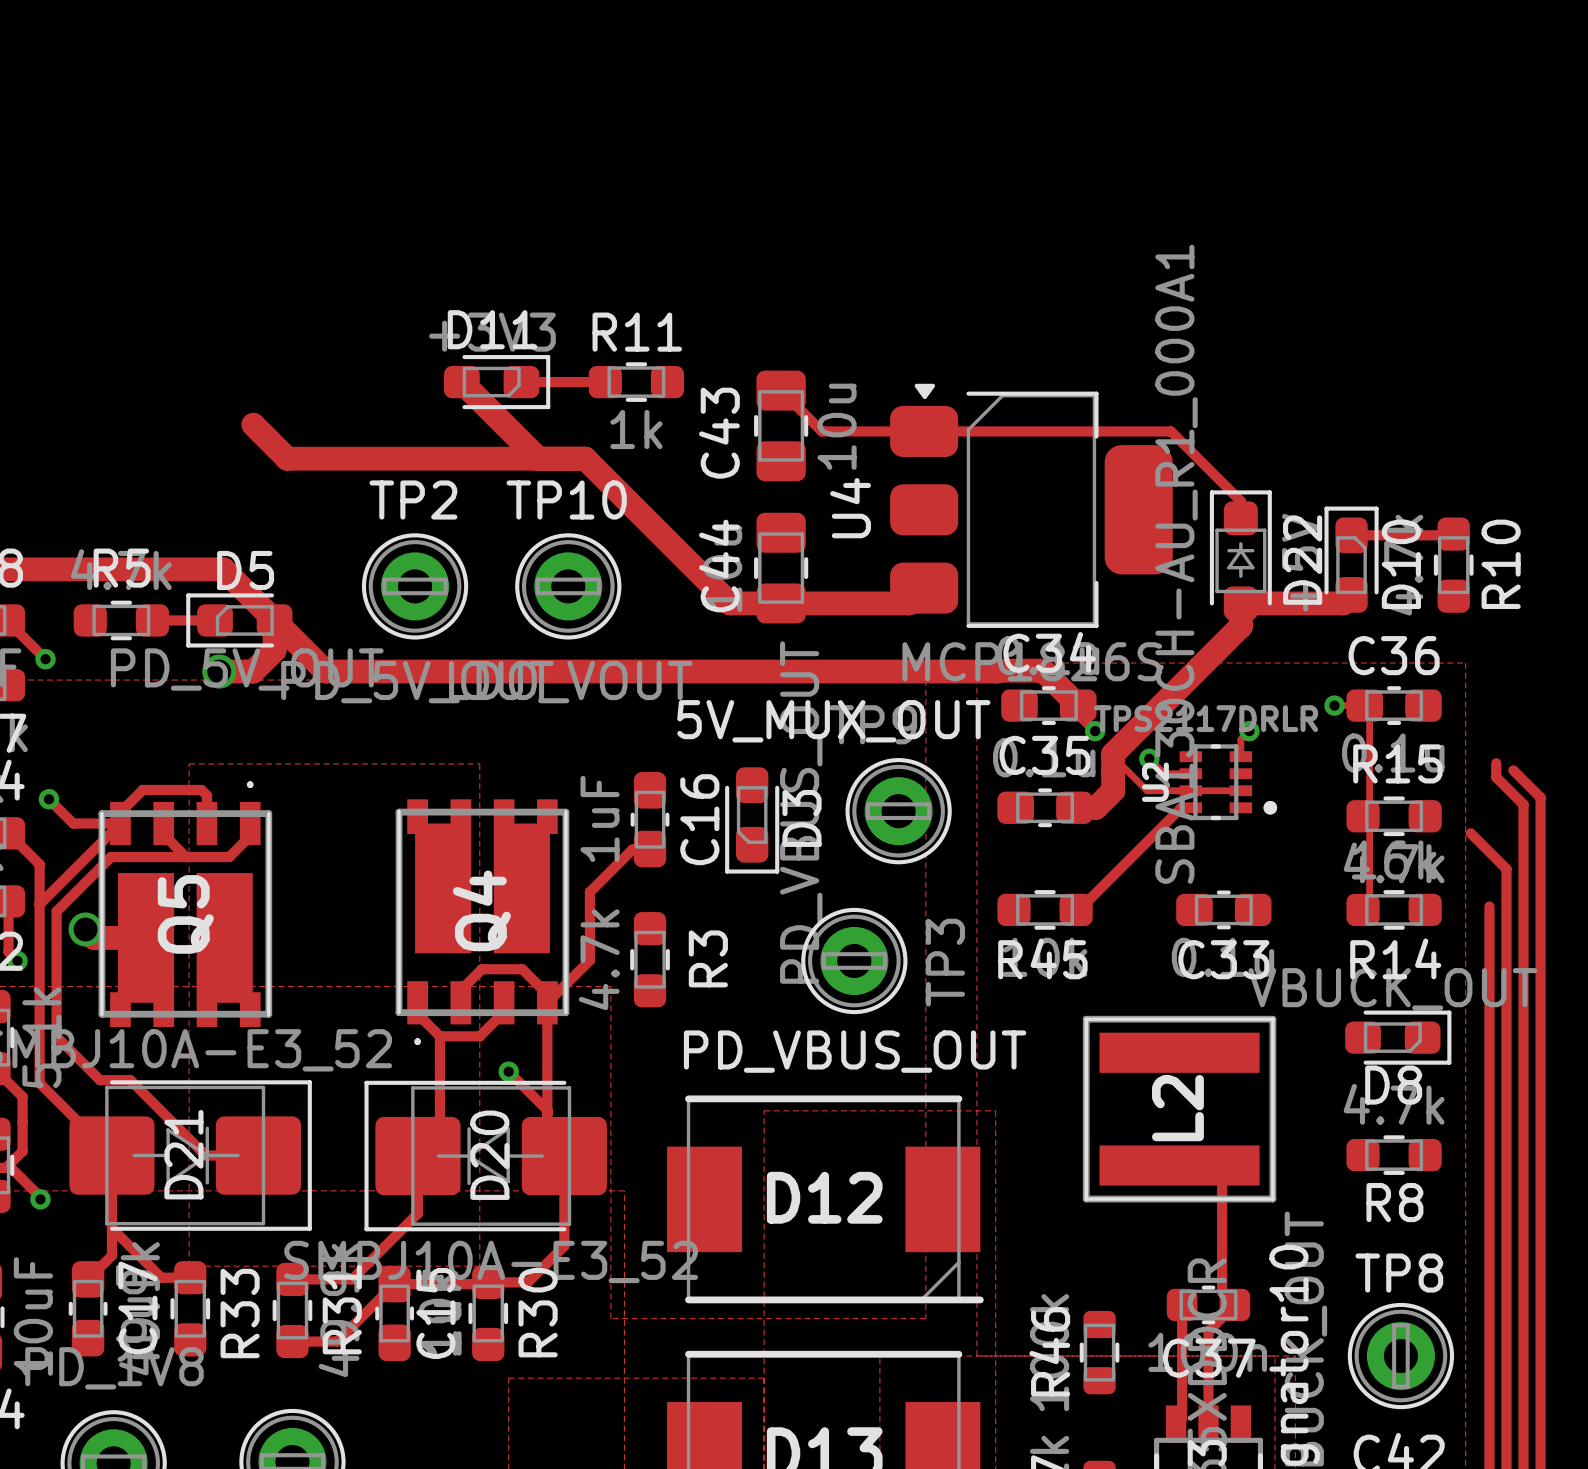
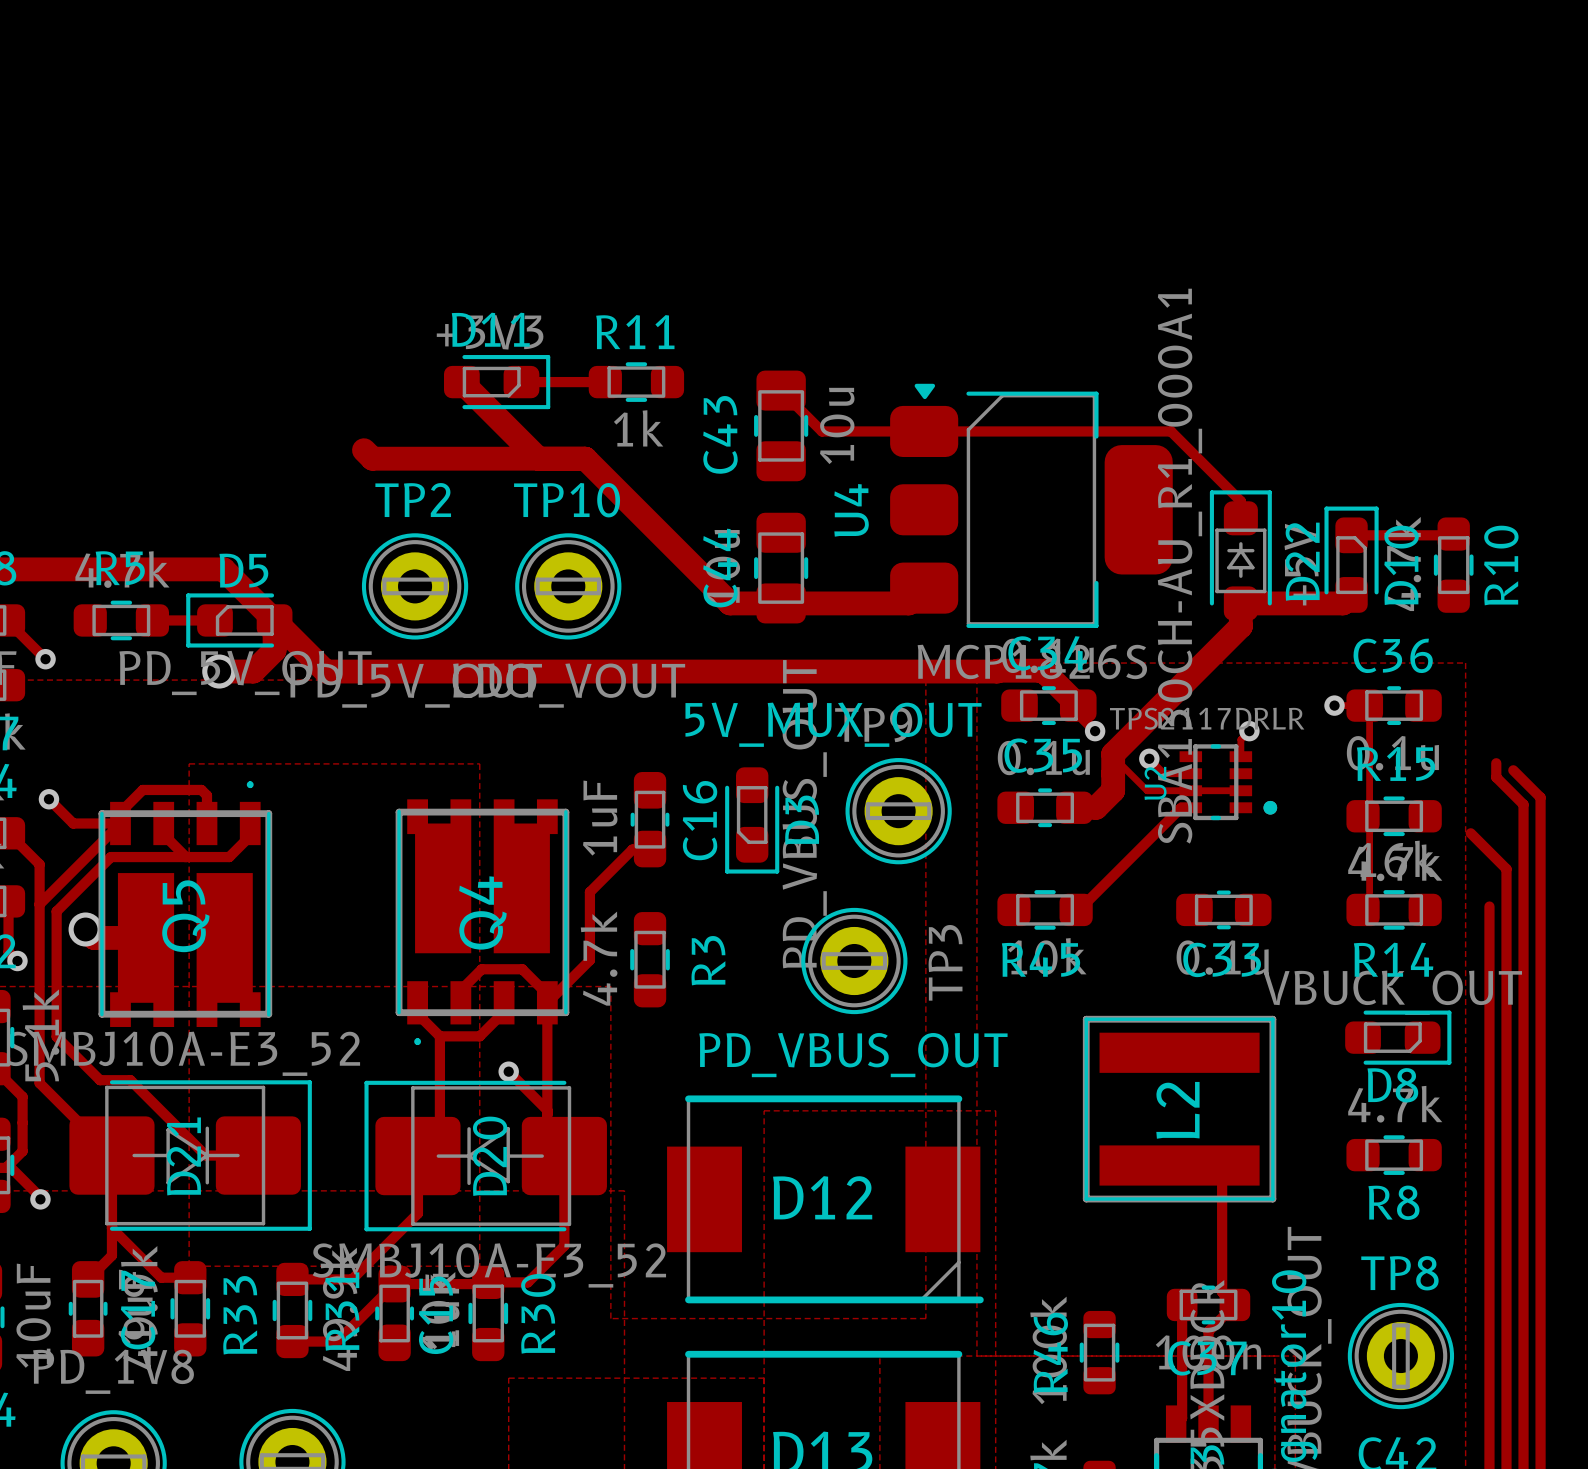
track: (253, 424) (287, 458) (372, 458) -> (363, 450) (372, 458)

